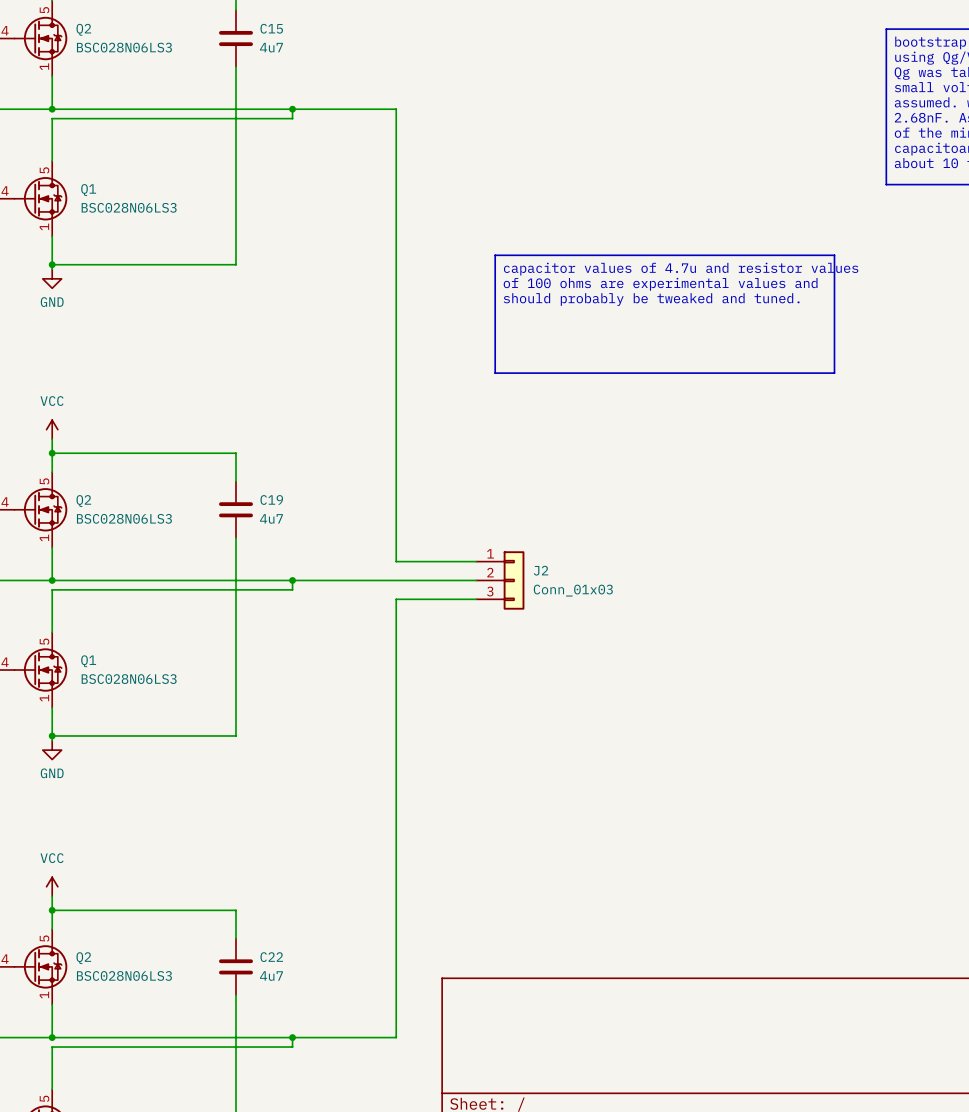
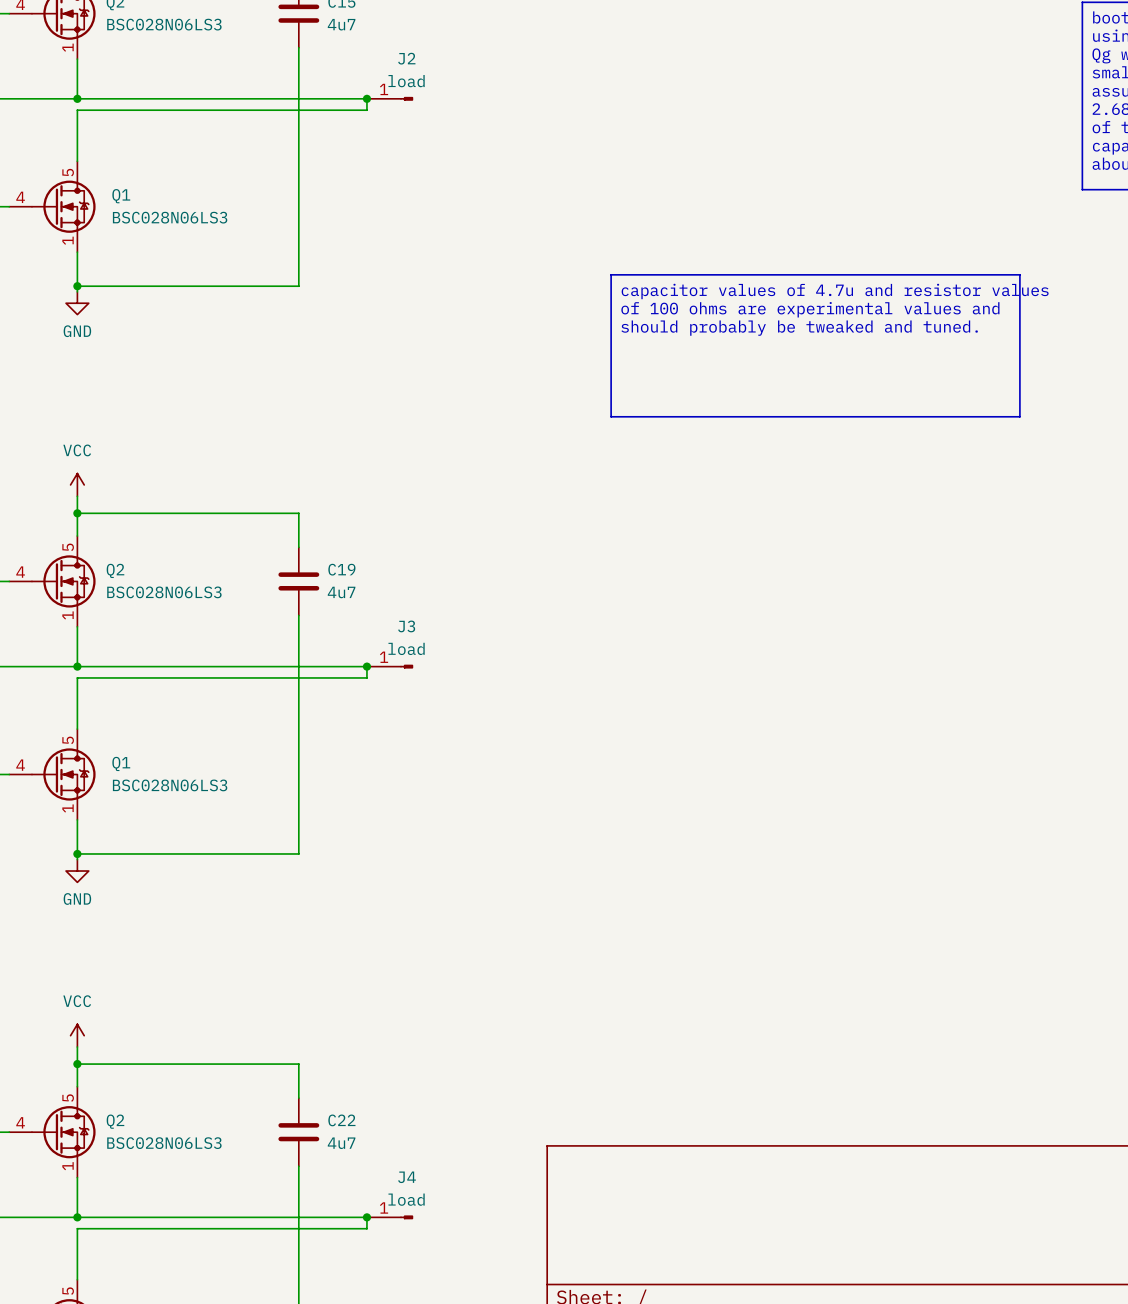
wire: (292, 109) (396, 109) (396, 561) (476, 561) -> none
J2 symbol: [476, 551, 525, 610] -> [366, 97, 414, 101]
J2 name position: J2 (541, 570) -> J2 (406, 58)
wire: (292, 580) (476, 580) -> none
J3: none -> load (390, 666)
J2 value: Conn_01x03 (573, 590) -> load (406, 81)
wire: (476, 599) (396, 599) (396, 1037) (292, 1037) -> none
J4: none -> load (390, 1217)

